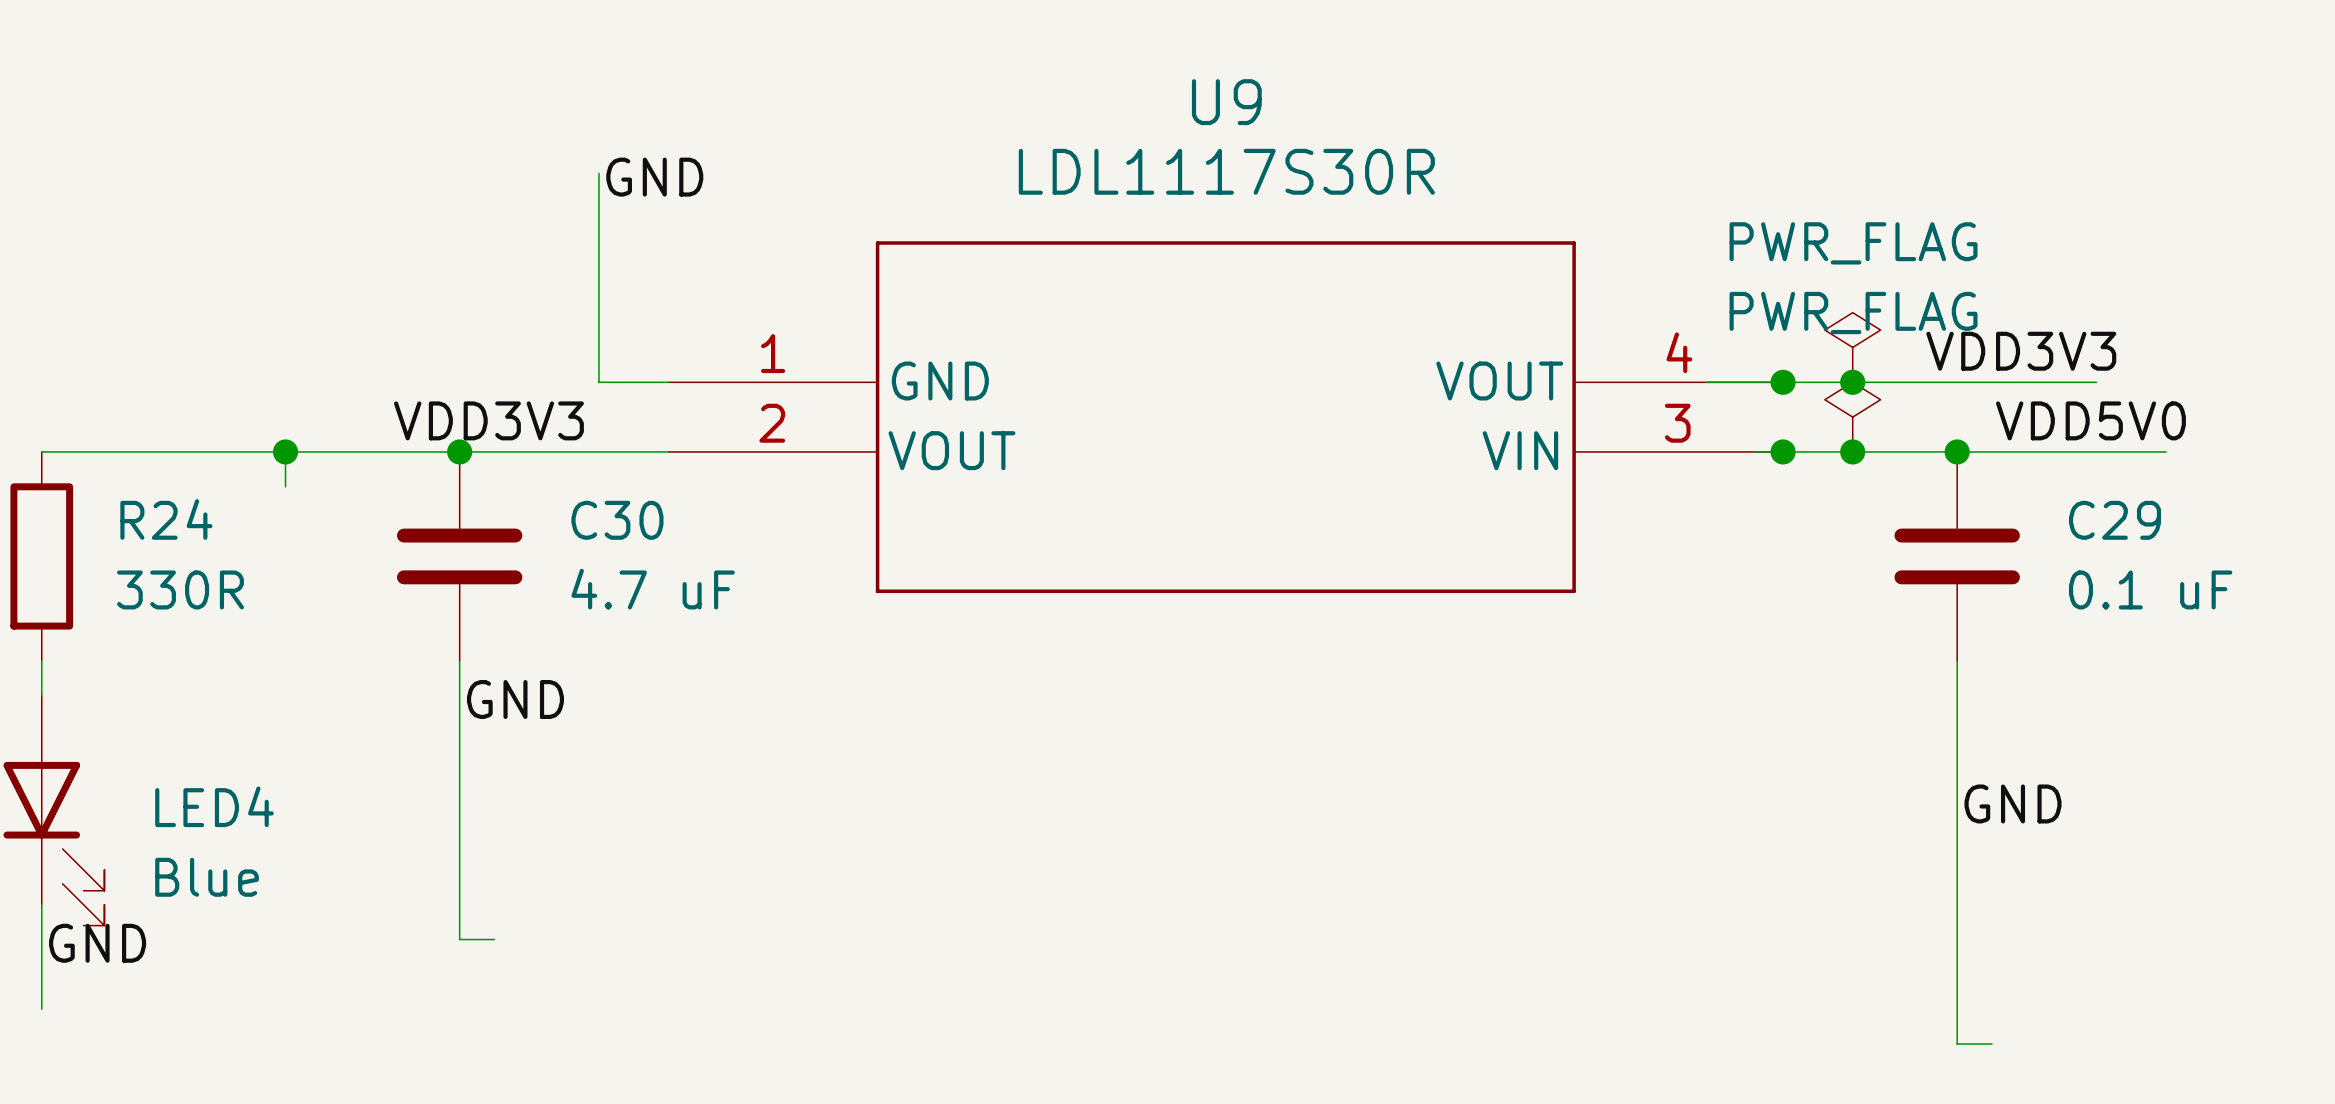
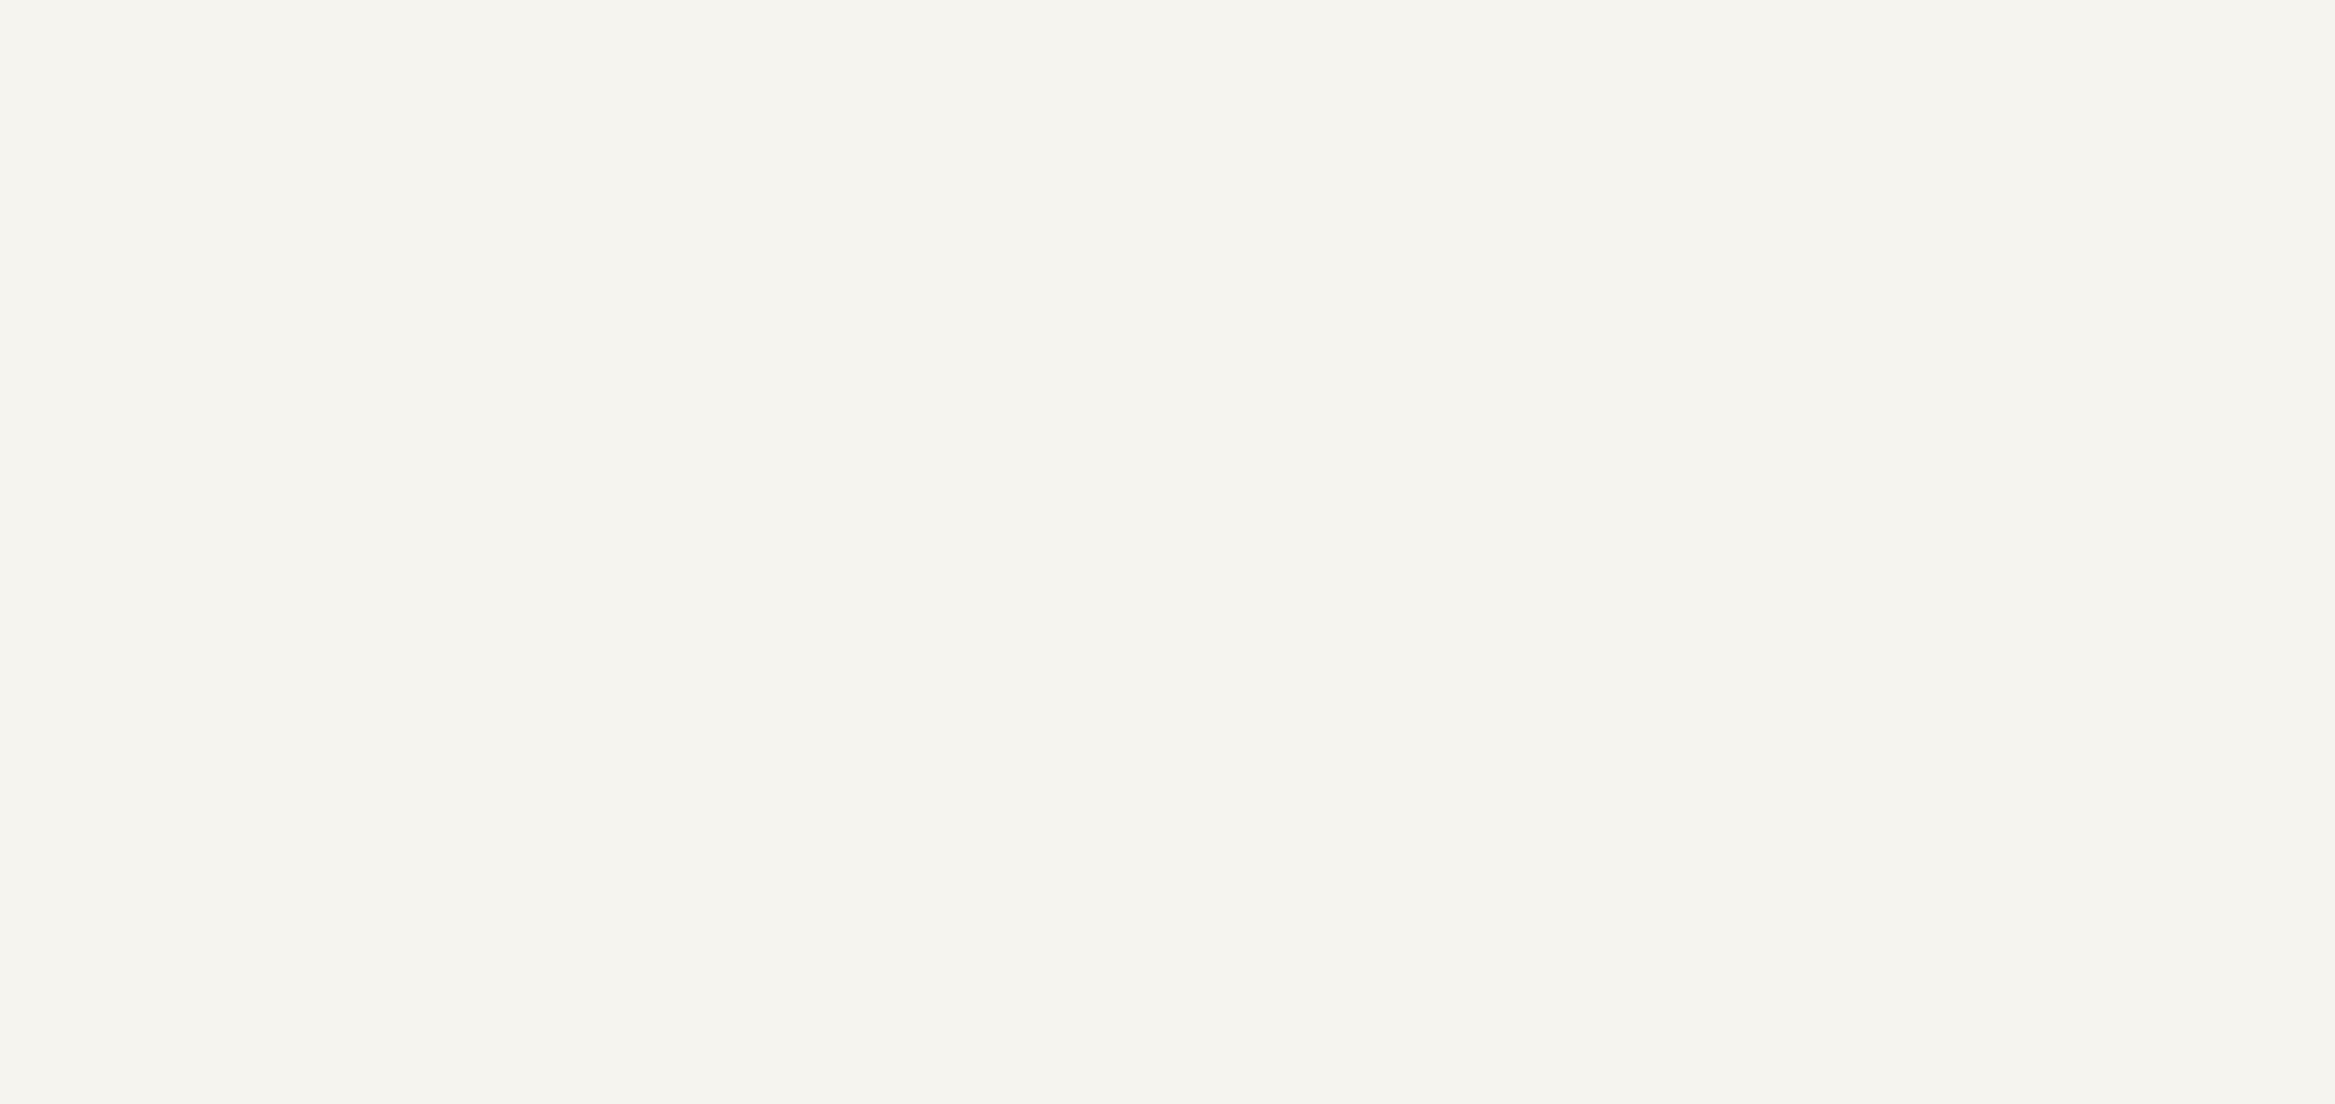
wire: (598, 173) (598, 382) (668, 382) -> none
label: GND (654, 177) -> none
power symbol: PWR_FLAG (1852, 347) -> none
label: VDD3V3 (2021, 351) -> none
wire: (1706, 382) (2096, 382) -> none
junction: (1783, 382) -> none
junction: (1852, 382) -> none
U9: LDL1117S30R (1225, 417) -> none
power symbol: PWR_FLAG (1852, 417) -> none
label: VDD3V3 (488, 420) -> none
label: VDD5V0 (2090, 420) -> none
wire: (41, 451) (668, 451) -> none
wire: (285, 451) (285, 486) -> none
junction: (285, 451) -> none
junction: (459, 451) -> none
wire: (1755, 451) (2166, 451) -> none
junction: (1783, 451) -> none
junction: (1852, 451) -> none
junction: (1957, 451) -> none
R24: 330R (41, 556) -> none
C30: 4.7 uF (459, 556) -> none
C29: 0.1 uF (1957, 556) -> none
wire: (41, 660) (41, 695) -> none
wire: (459, 660) (459, 939) (494, 939) -> none
wire: (1957, 660) (1957, 1044) (1992, 1044) -> none
label: GND (515, 699) -> none
label: GND (2013, 803) -> none
LED4: Blue (53, 810) -> none
wire: (41, 904) (41, 1009) -> none
label: GND (97, 943) -> none

